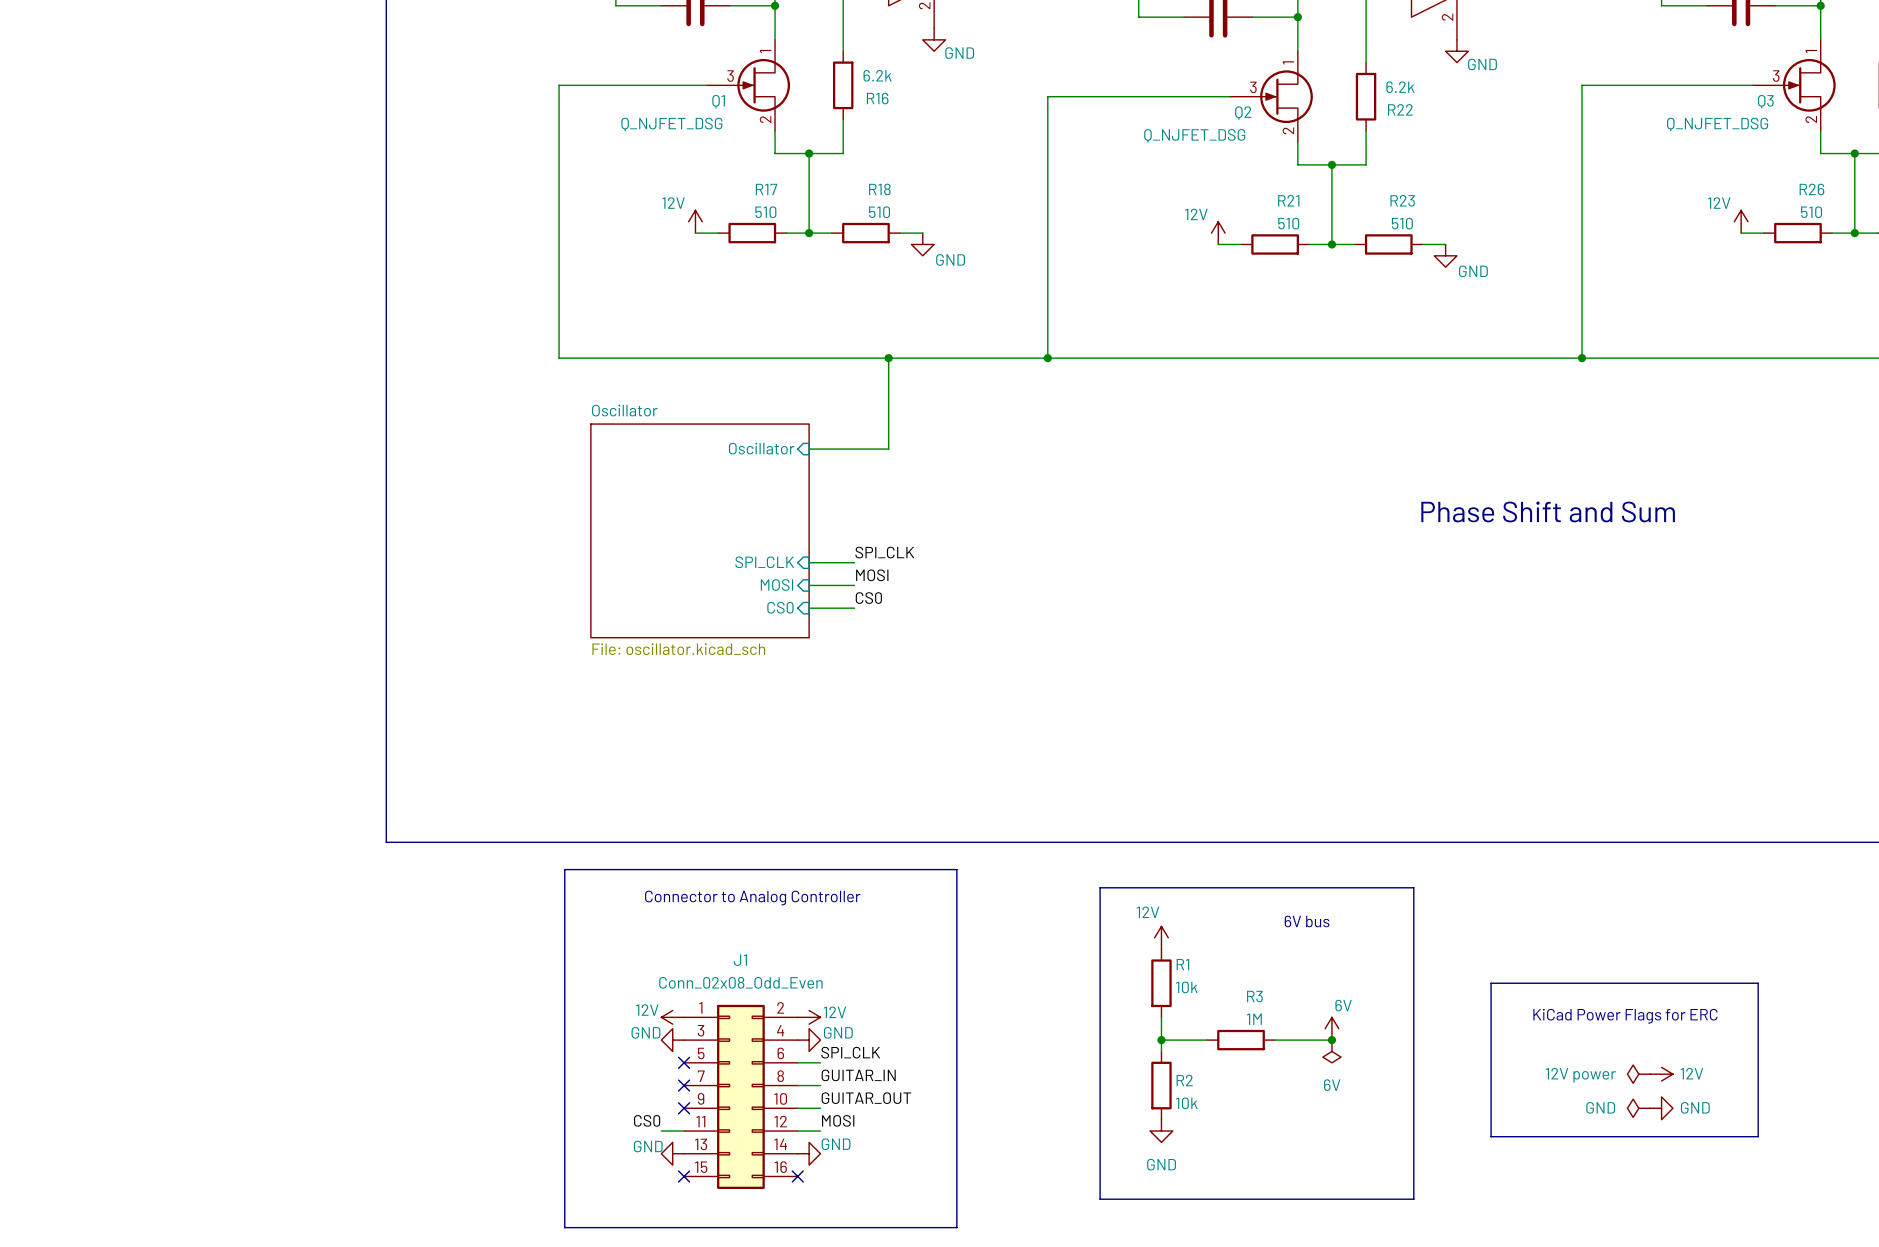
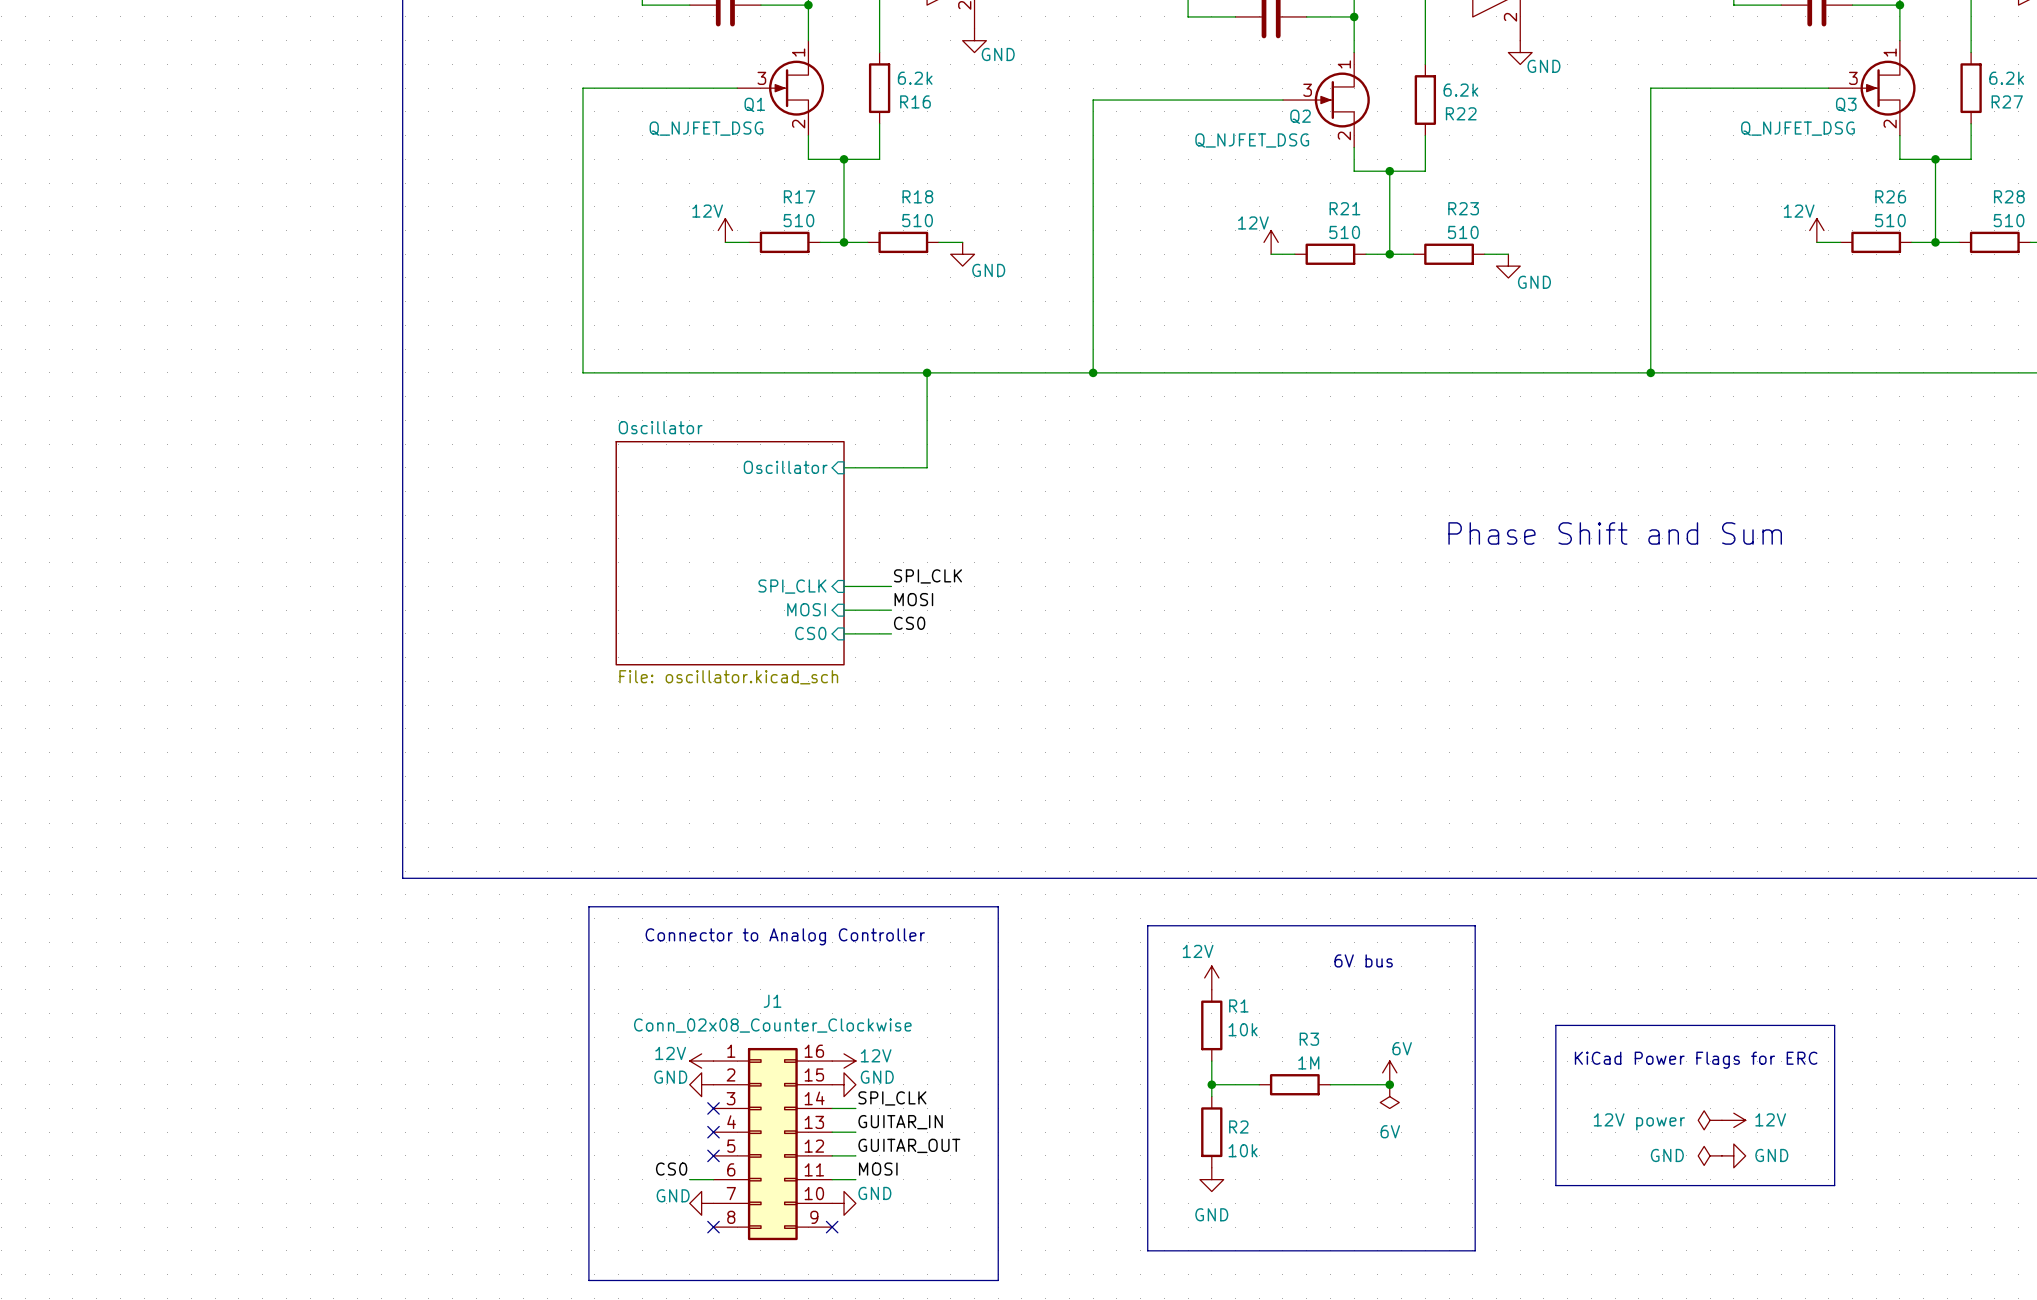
J1 value: Conn_02x08_Odd_Even (740, 982) -> Conn_02x08_Counter_Clockwise (772, 1025)
J1 symbol: [684, 1004, 798, 1189] -> [713, 1047, 833, 1241]

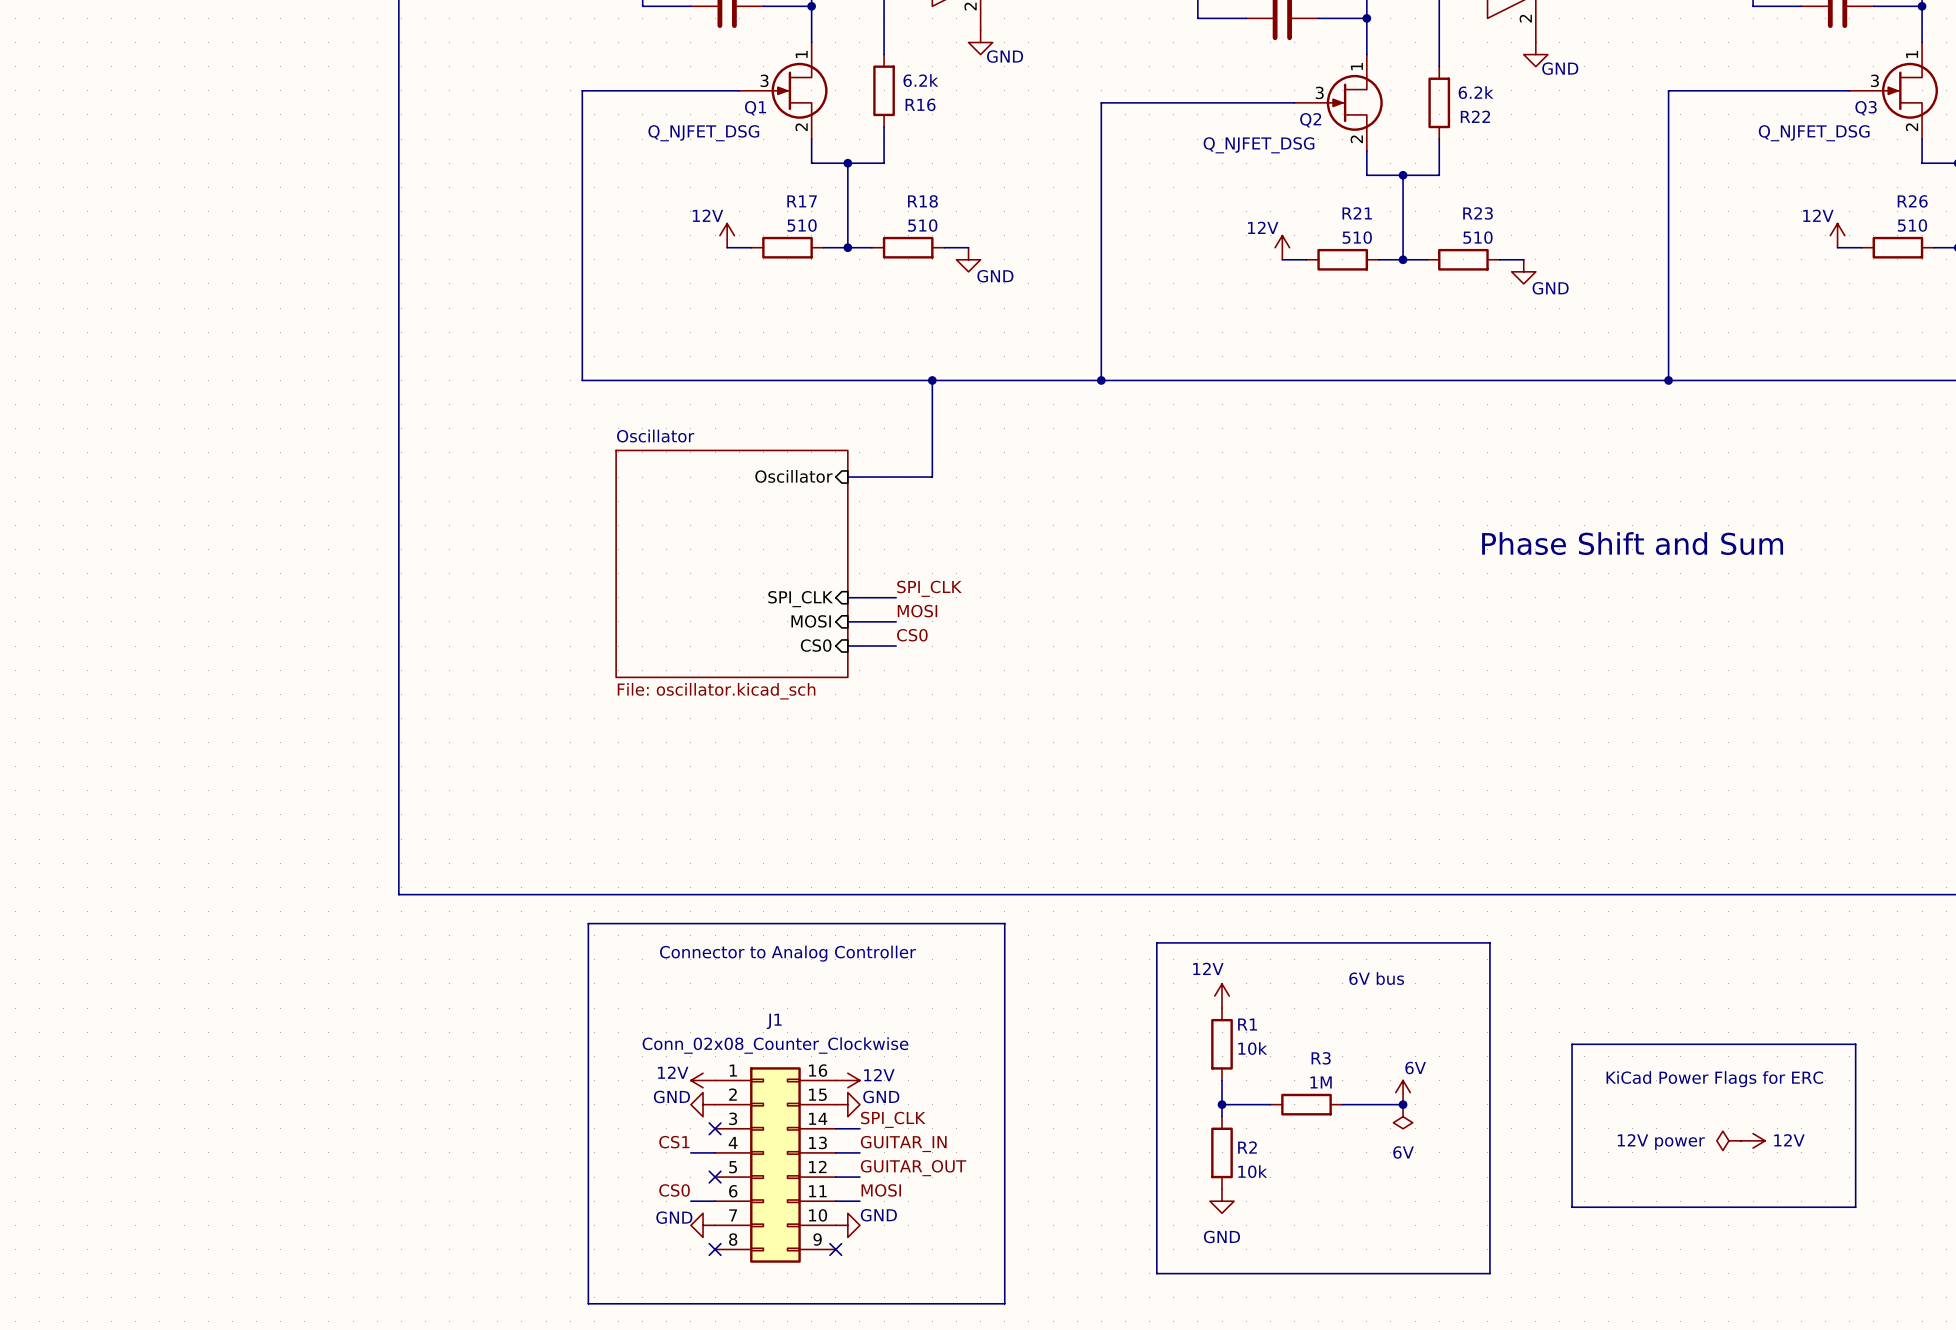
label: none -> CS1 (674, 1142)
wire: none -> (690, 1152) (715, 1152)
no-connect mark: (713, 1132) -> none
power symbol: GND (1710, 1155) -> none
power symbol: GND (1733, 1155) -> none

